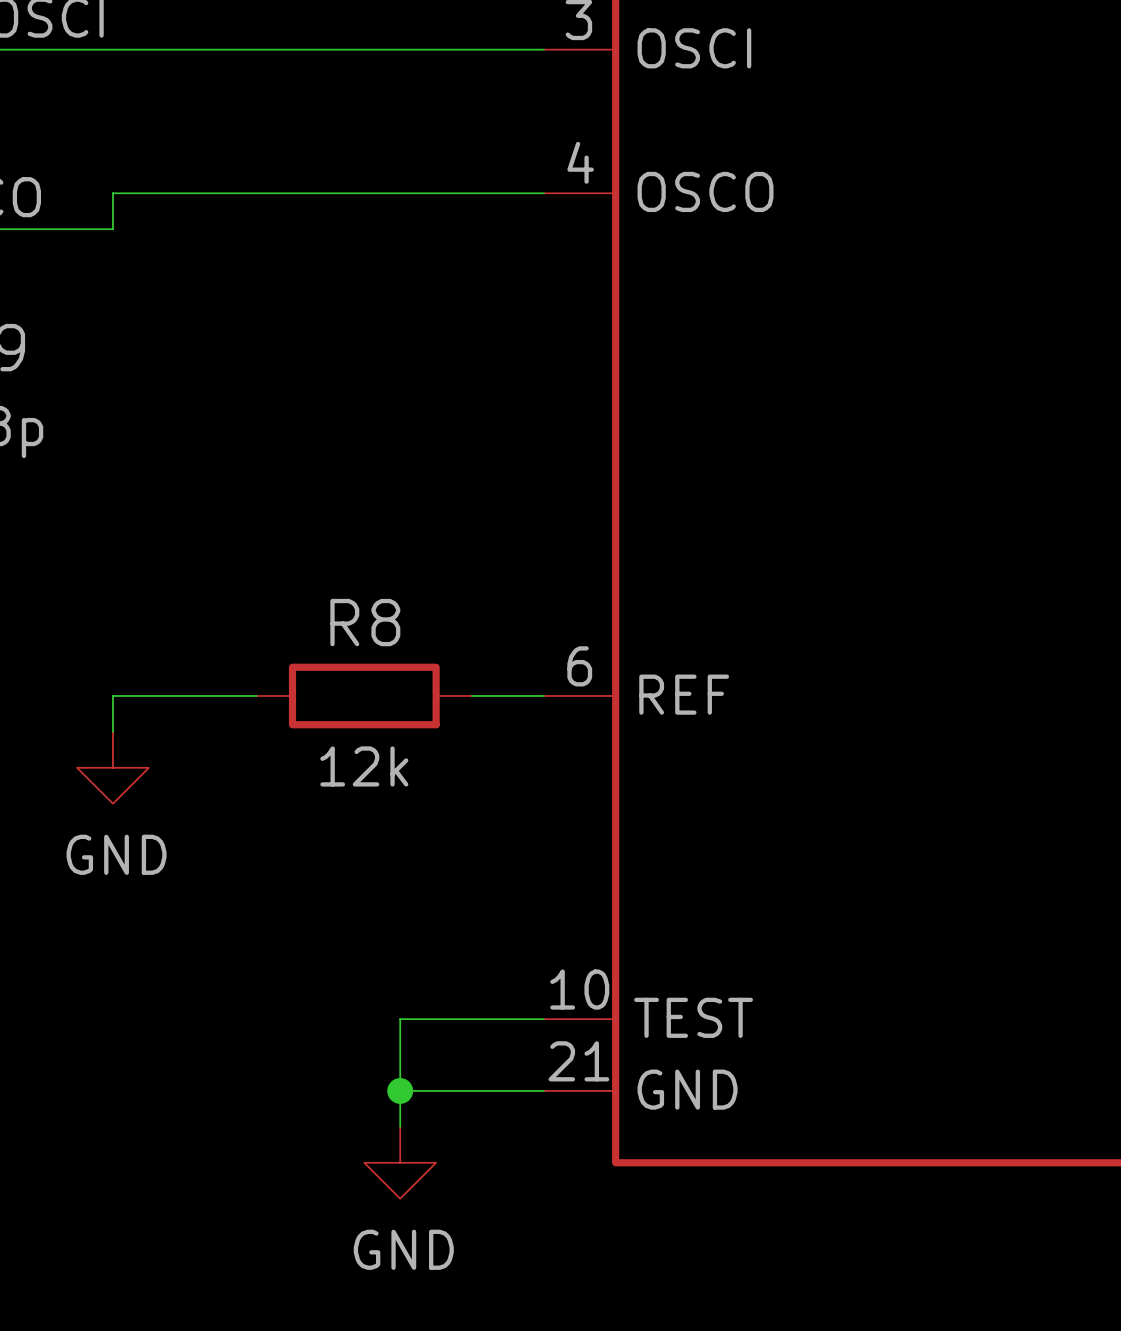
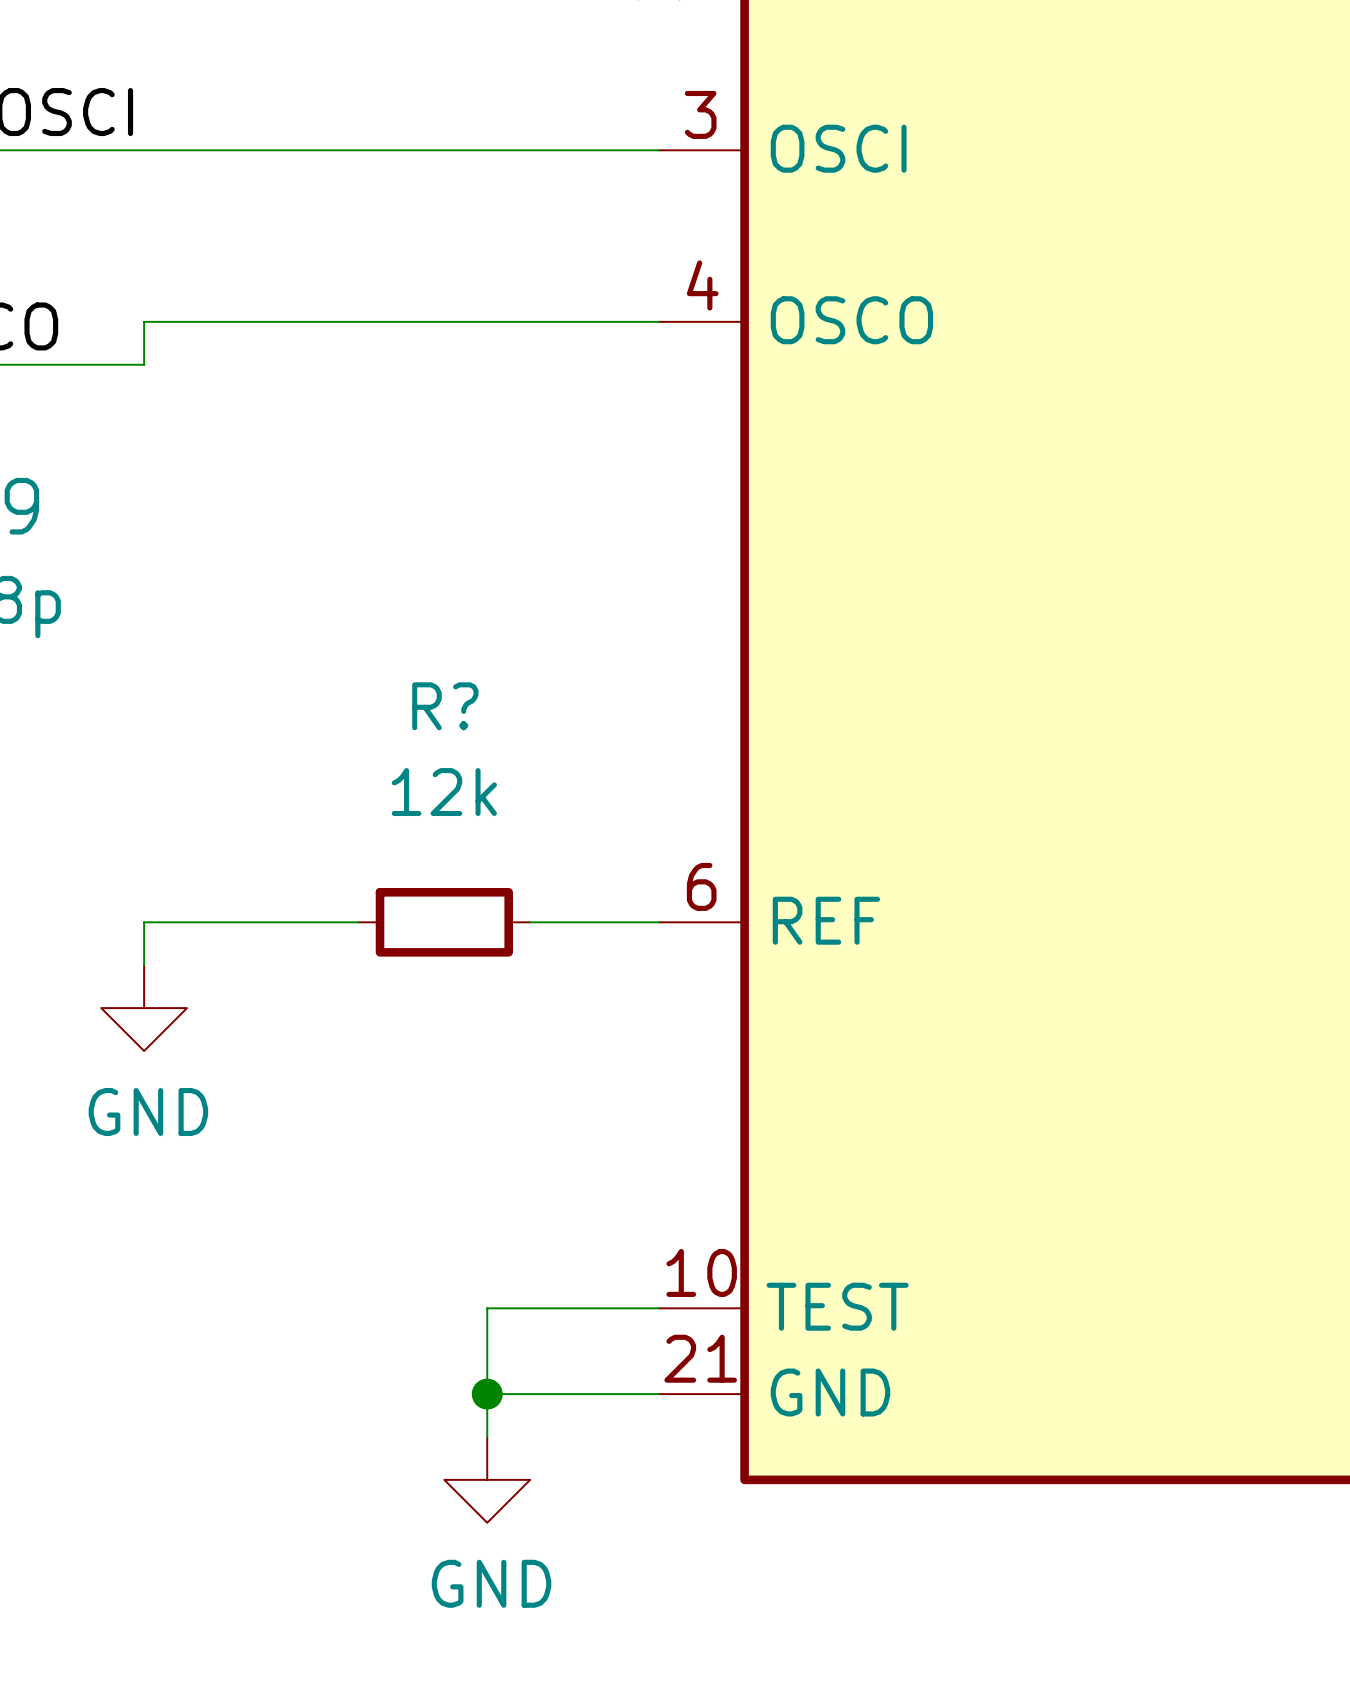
R8: (364, 695) -> none
R?: none -> (444, 922)

